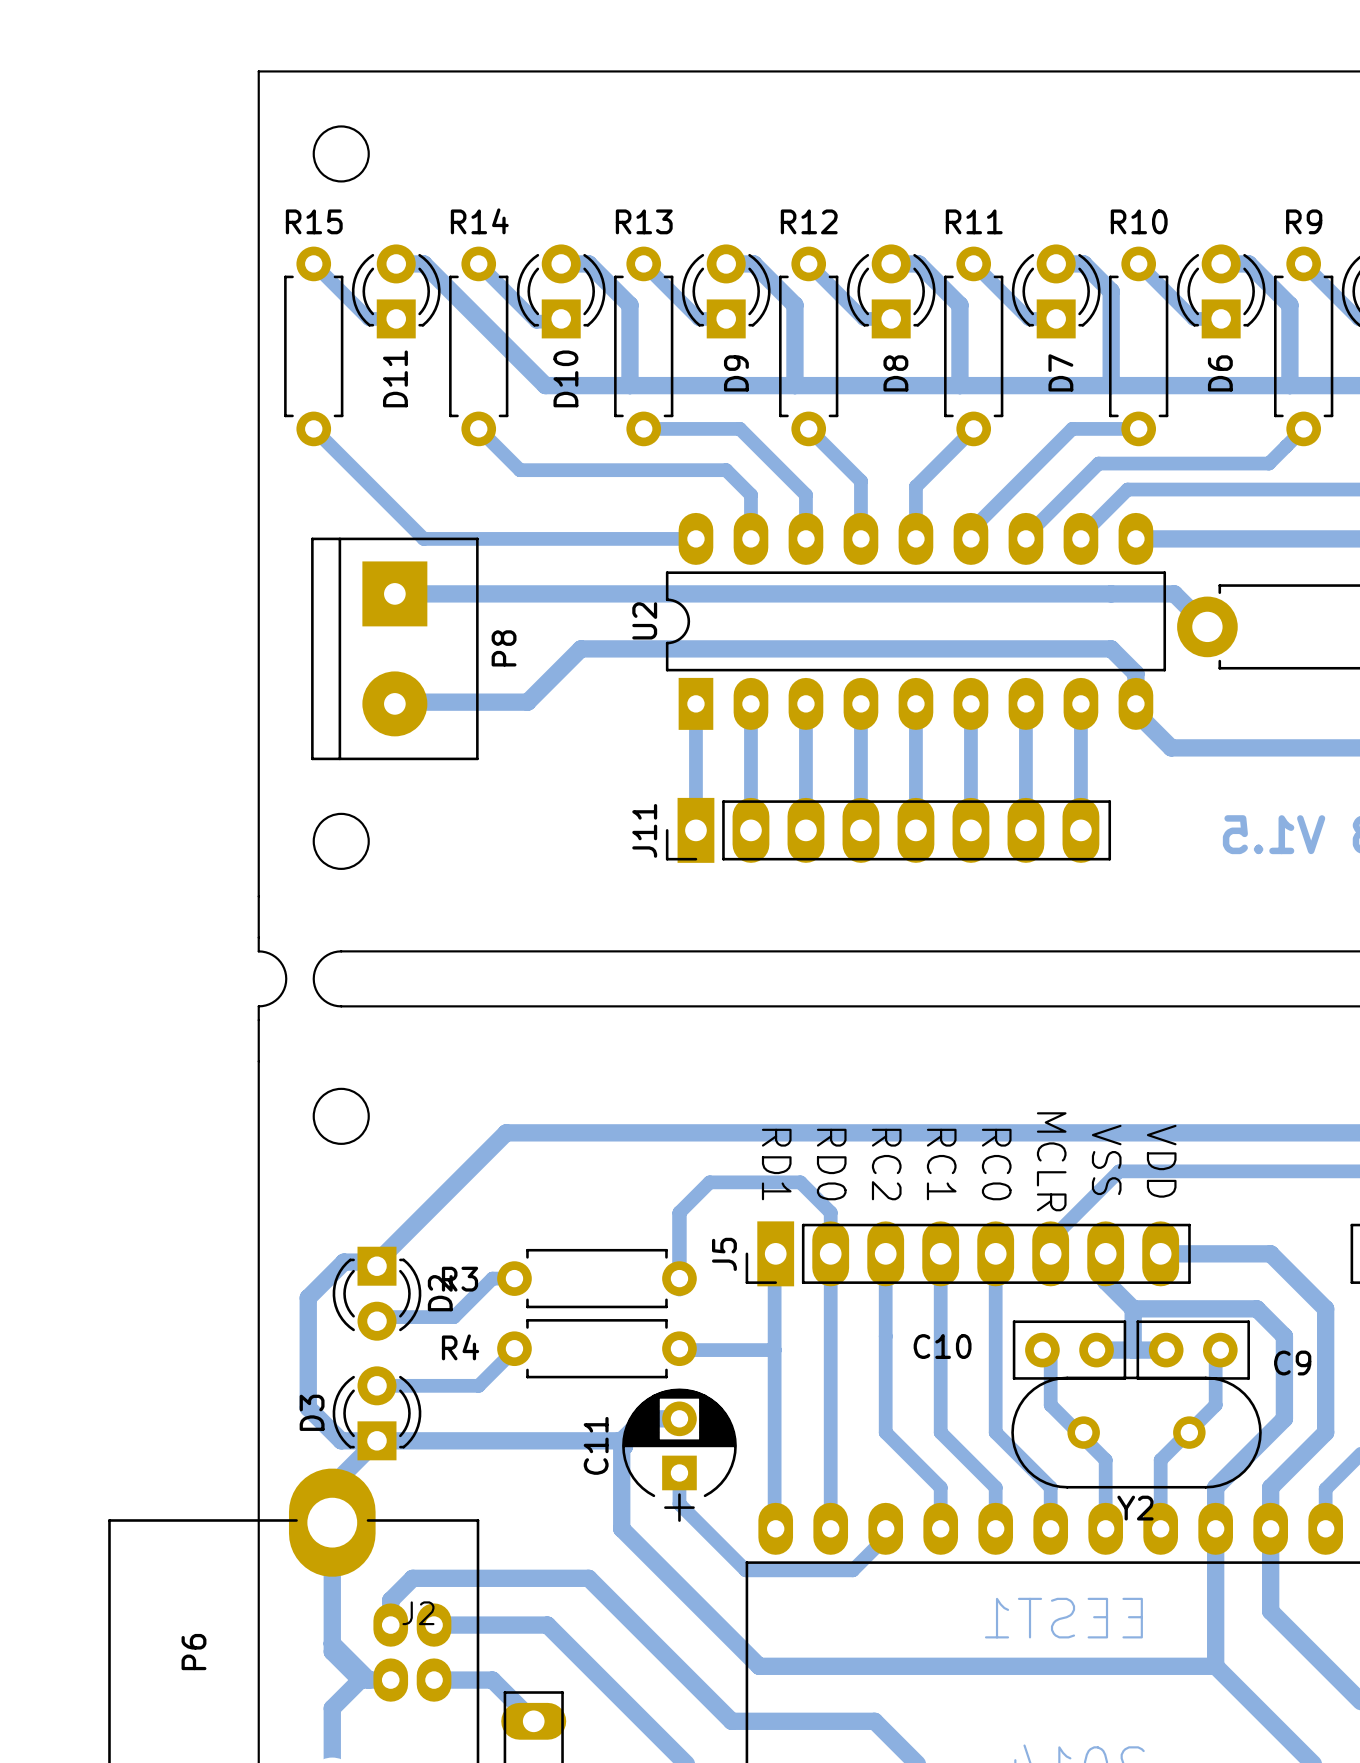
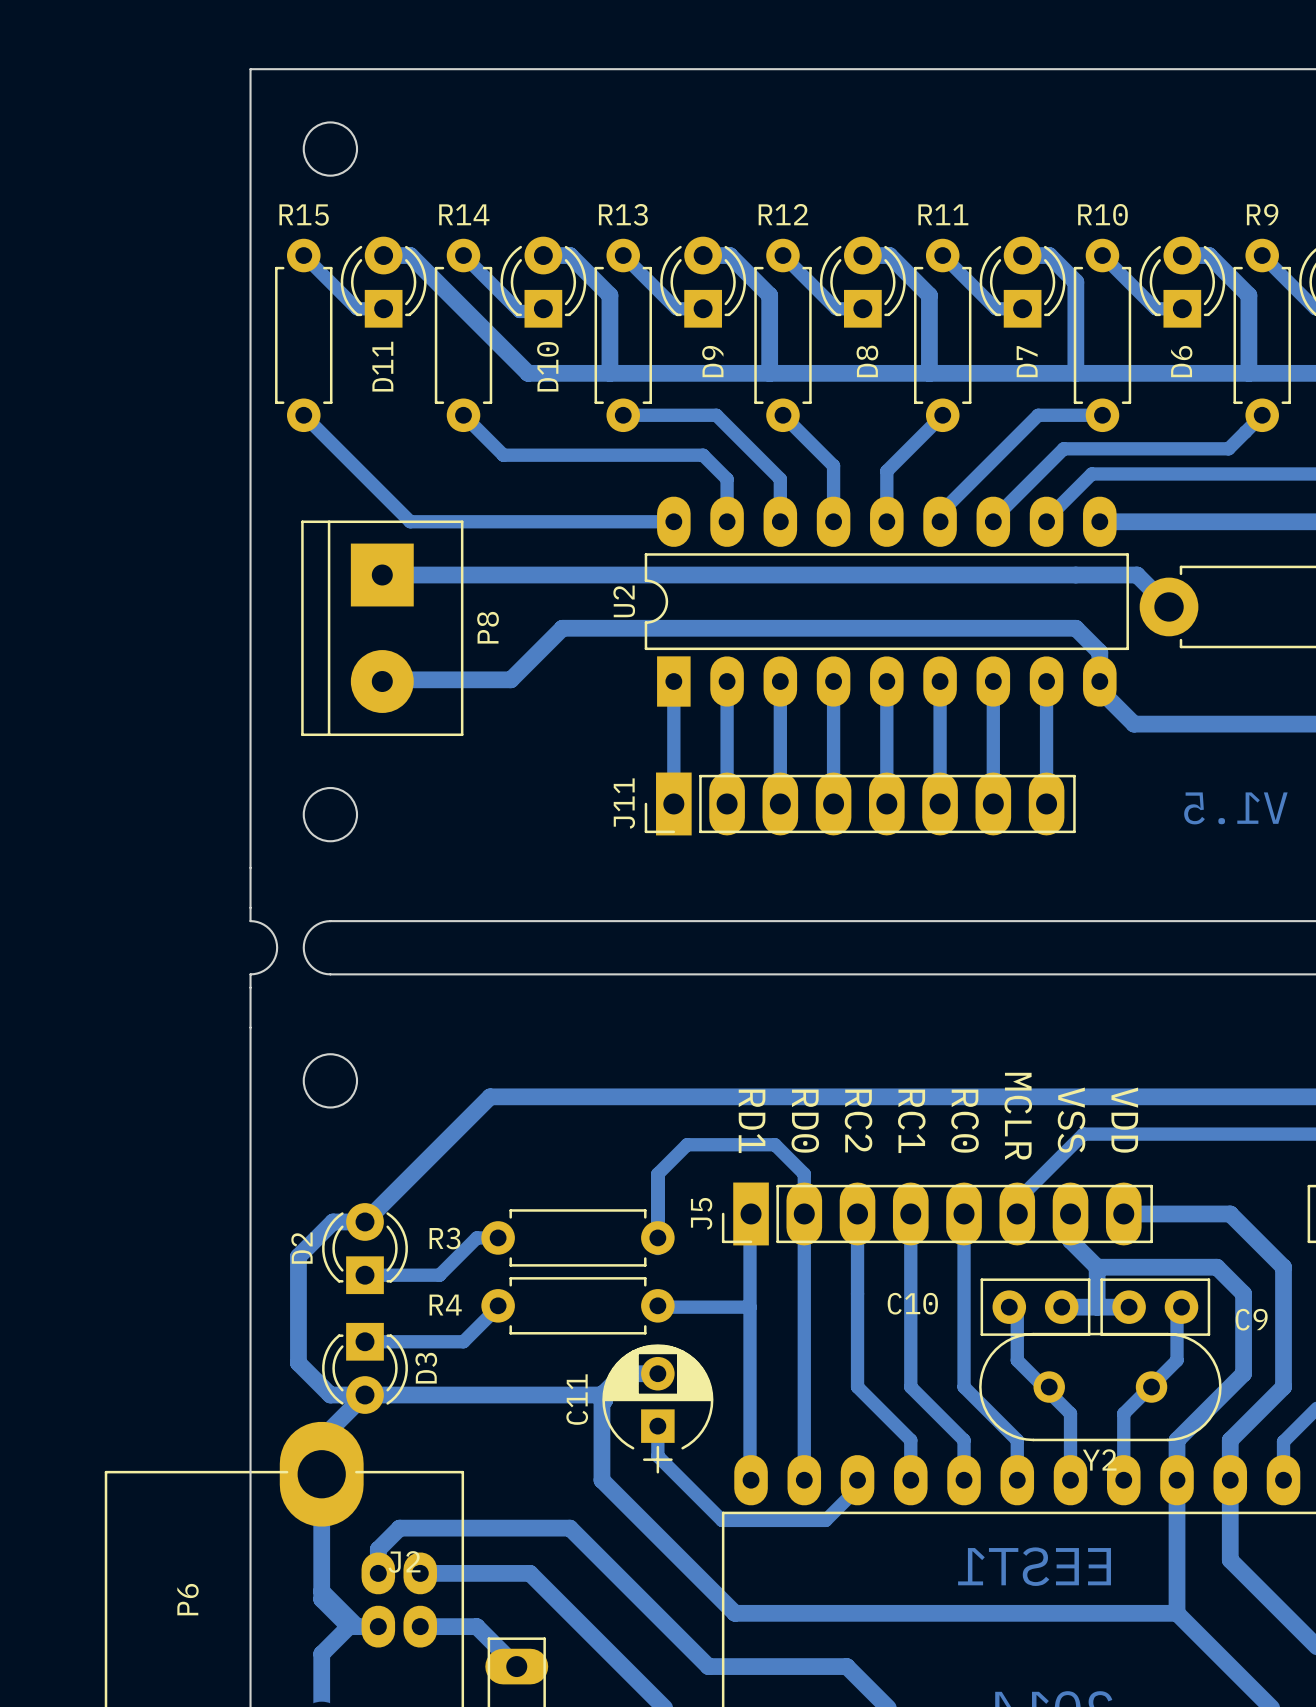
D2 rotation: 0° (376, 1293) -> 180° (365, 1248)
D3 rotation: 0° (376, 1413) -> 180° (365, 1368)

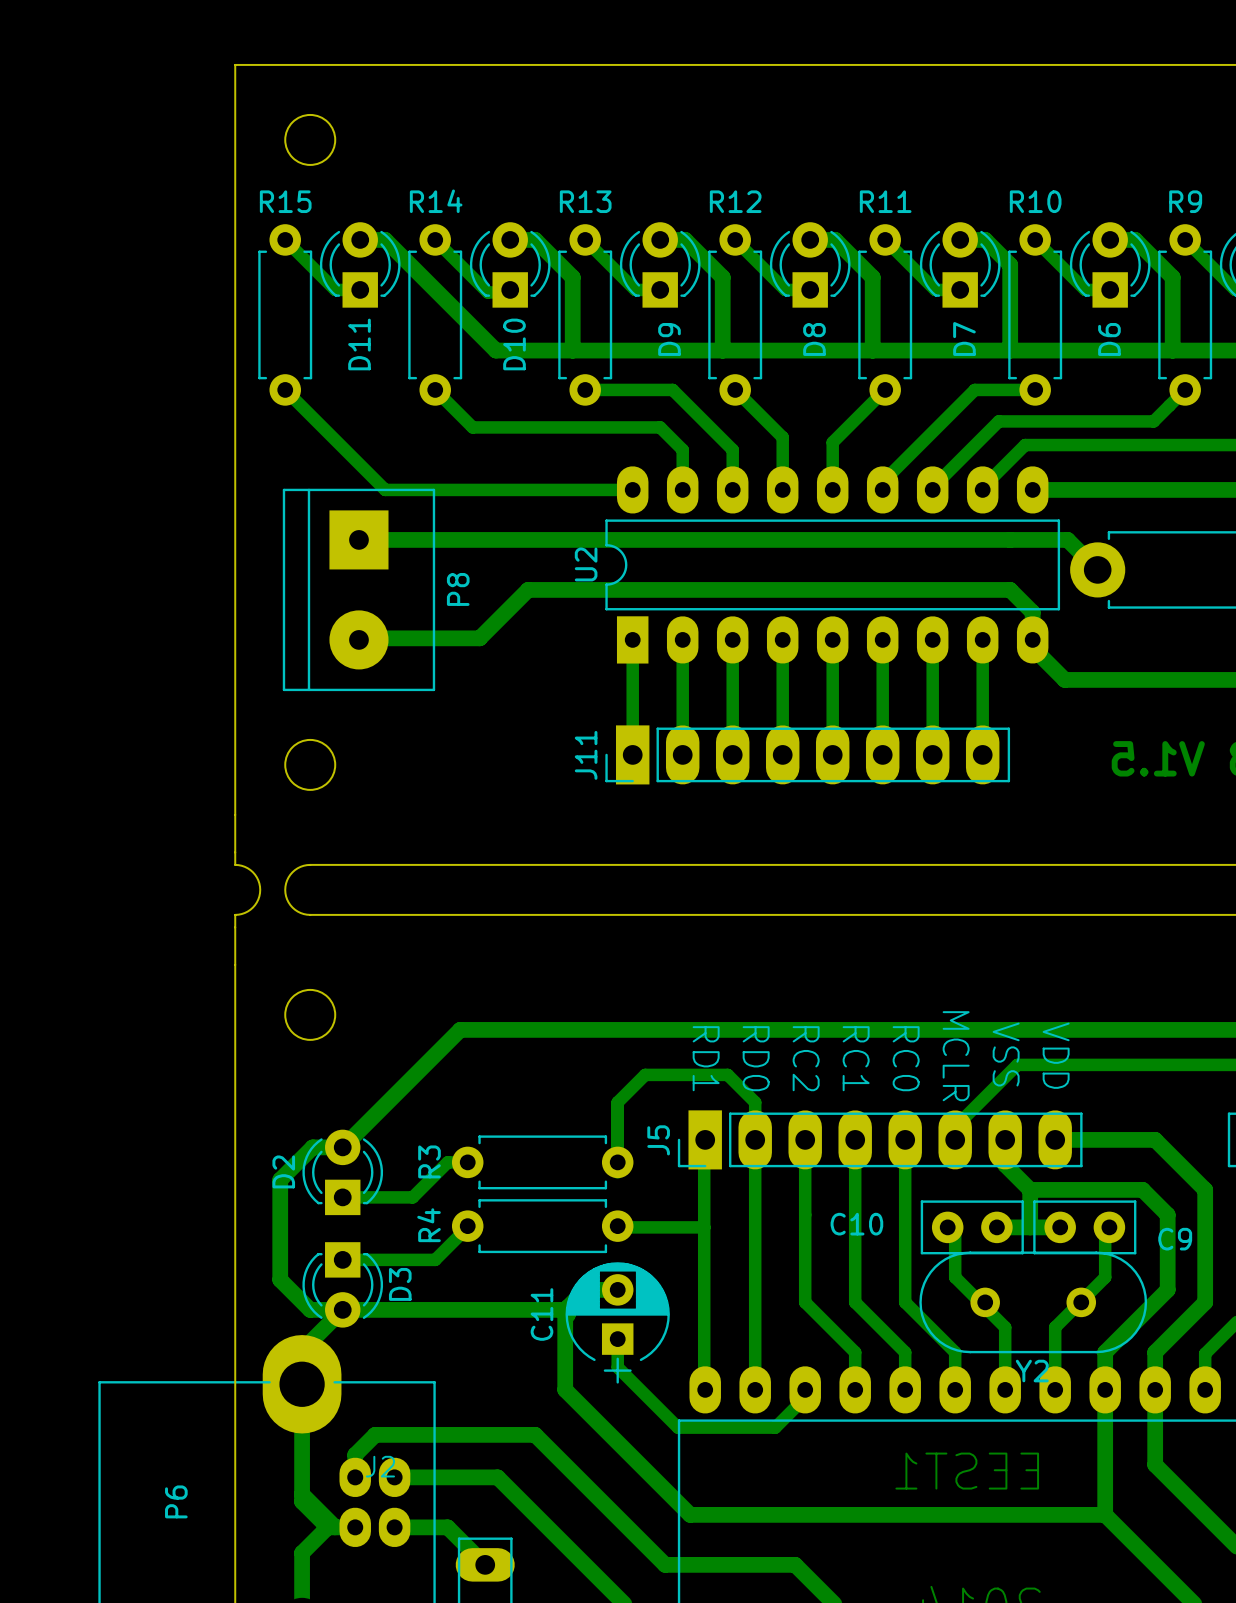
R3 name rotation: 0° (444, 1238) -> 90° counterclockwise (429, 1161)
R4 name rotation: 0° (445, 1305) -> 90° counterclockwise (429, 1225)

